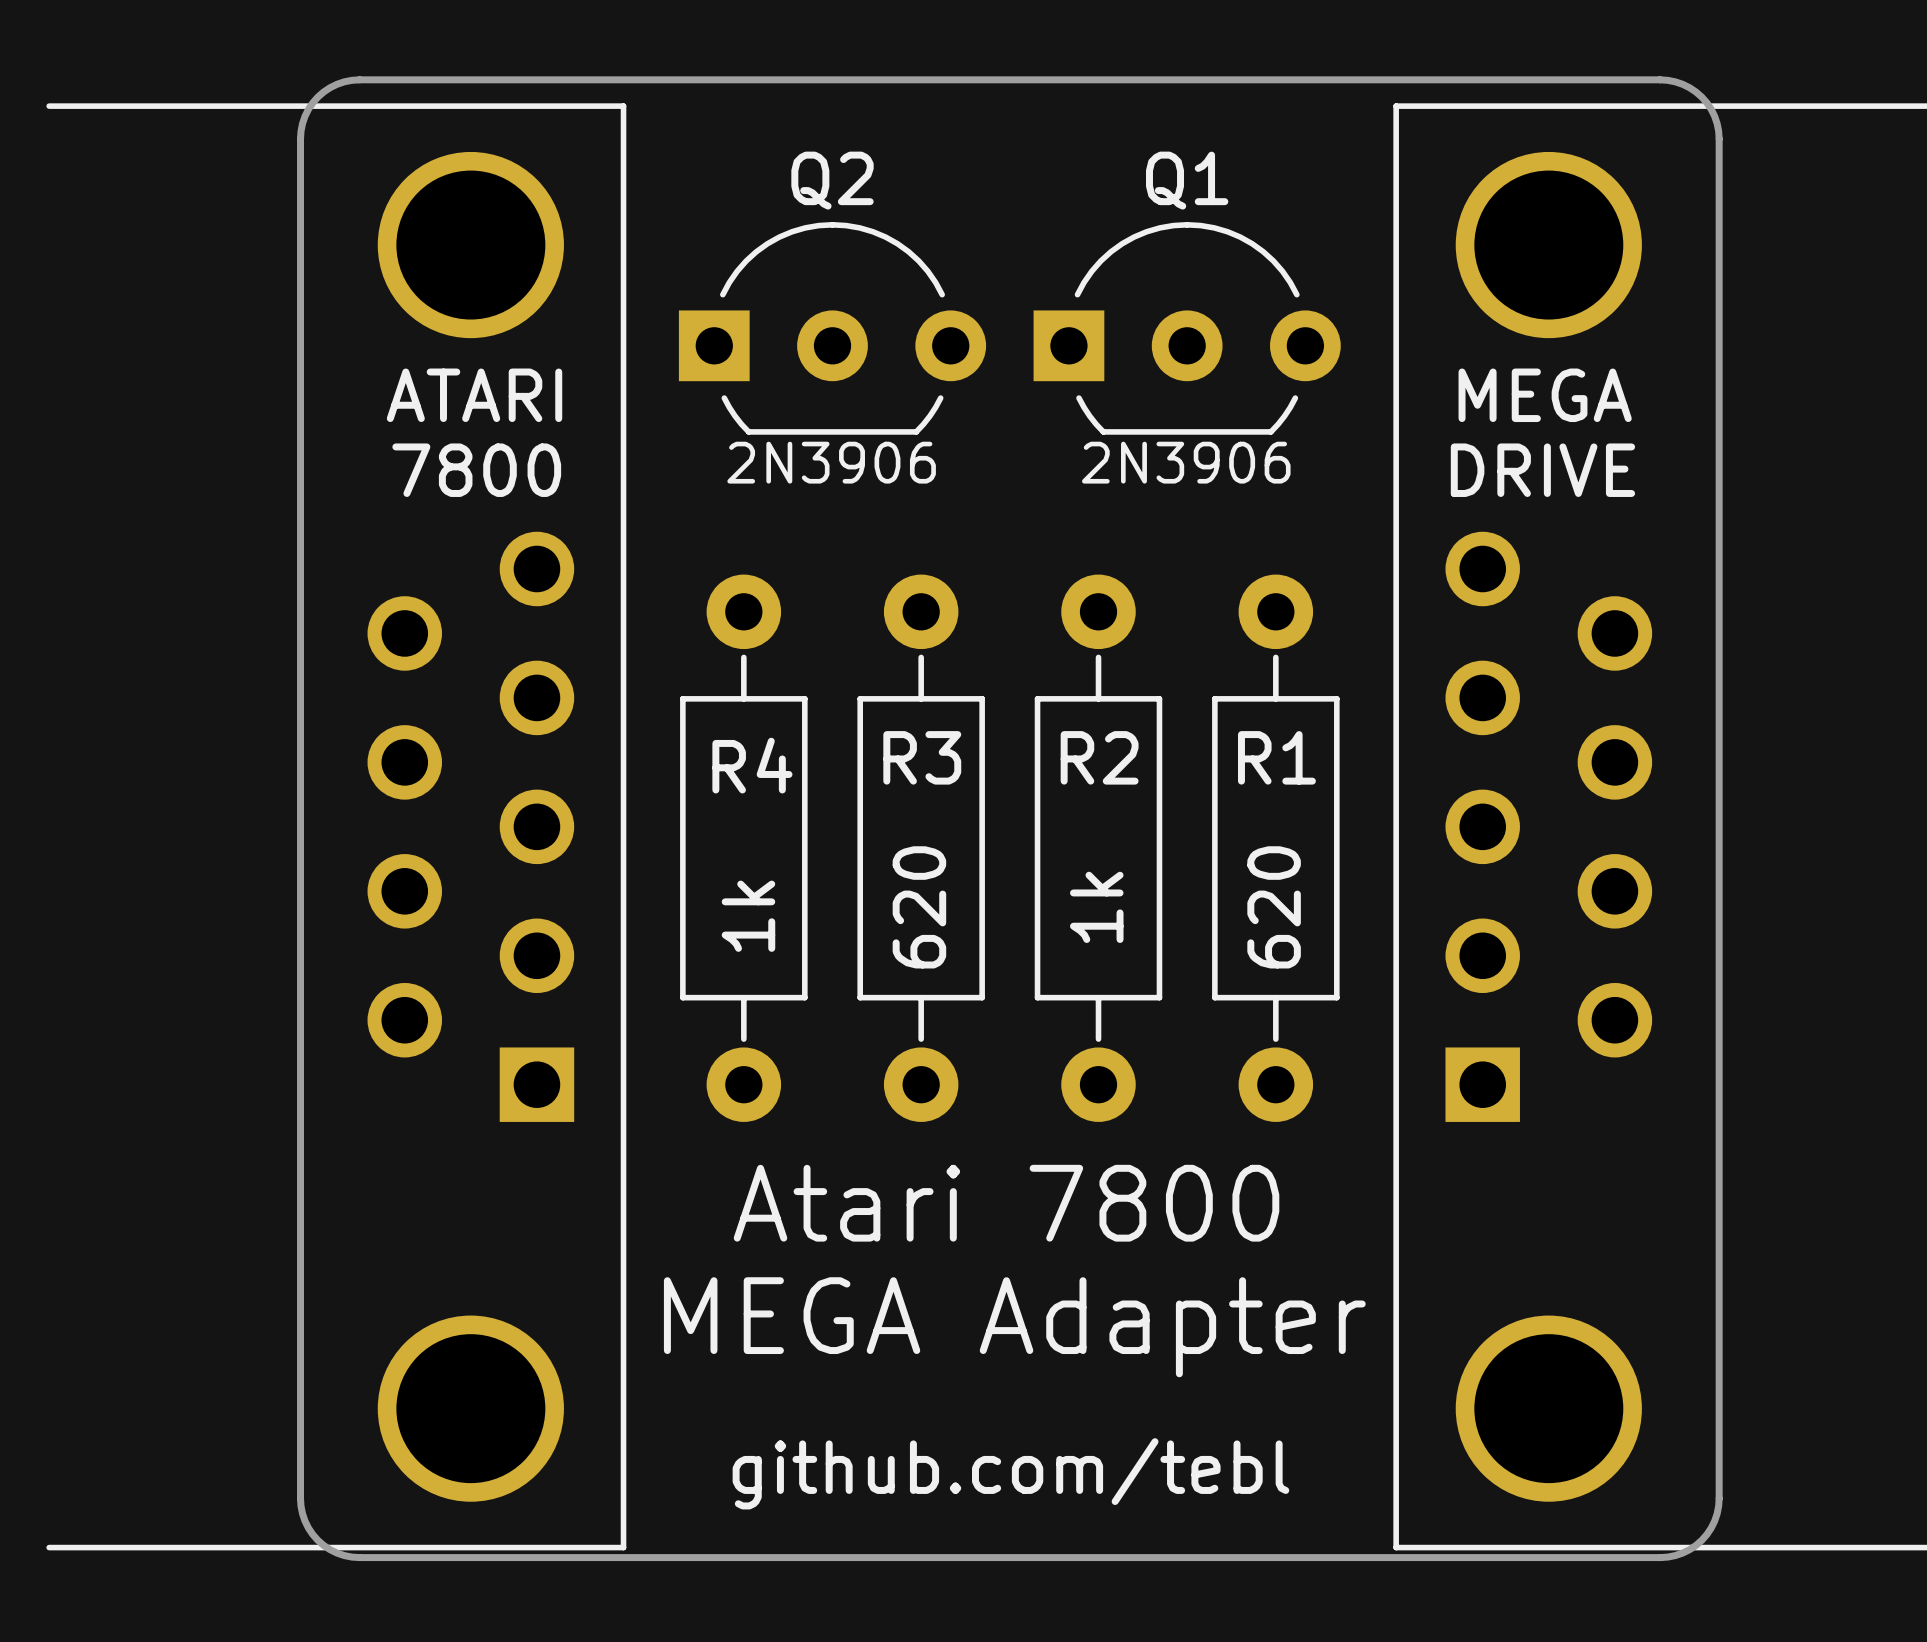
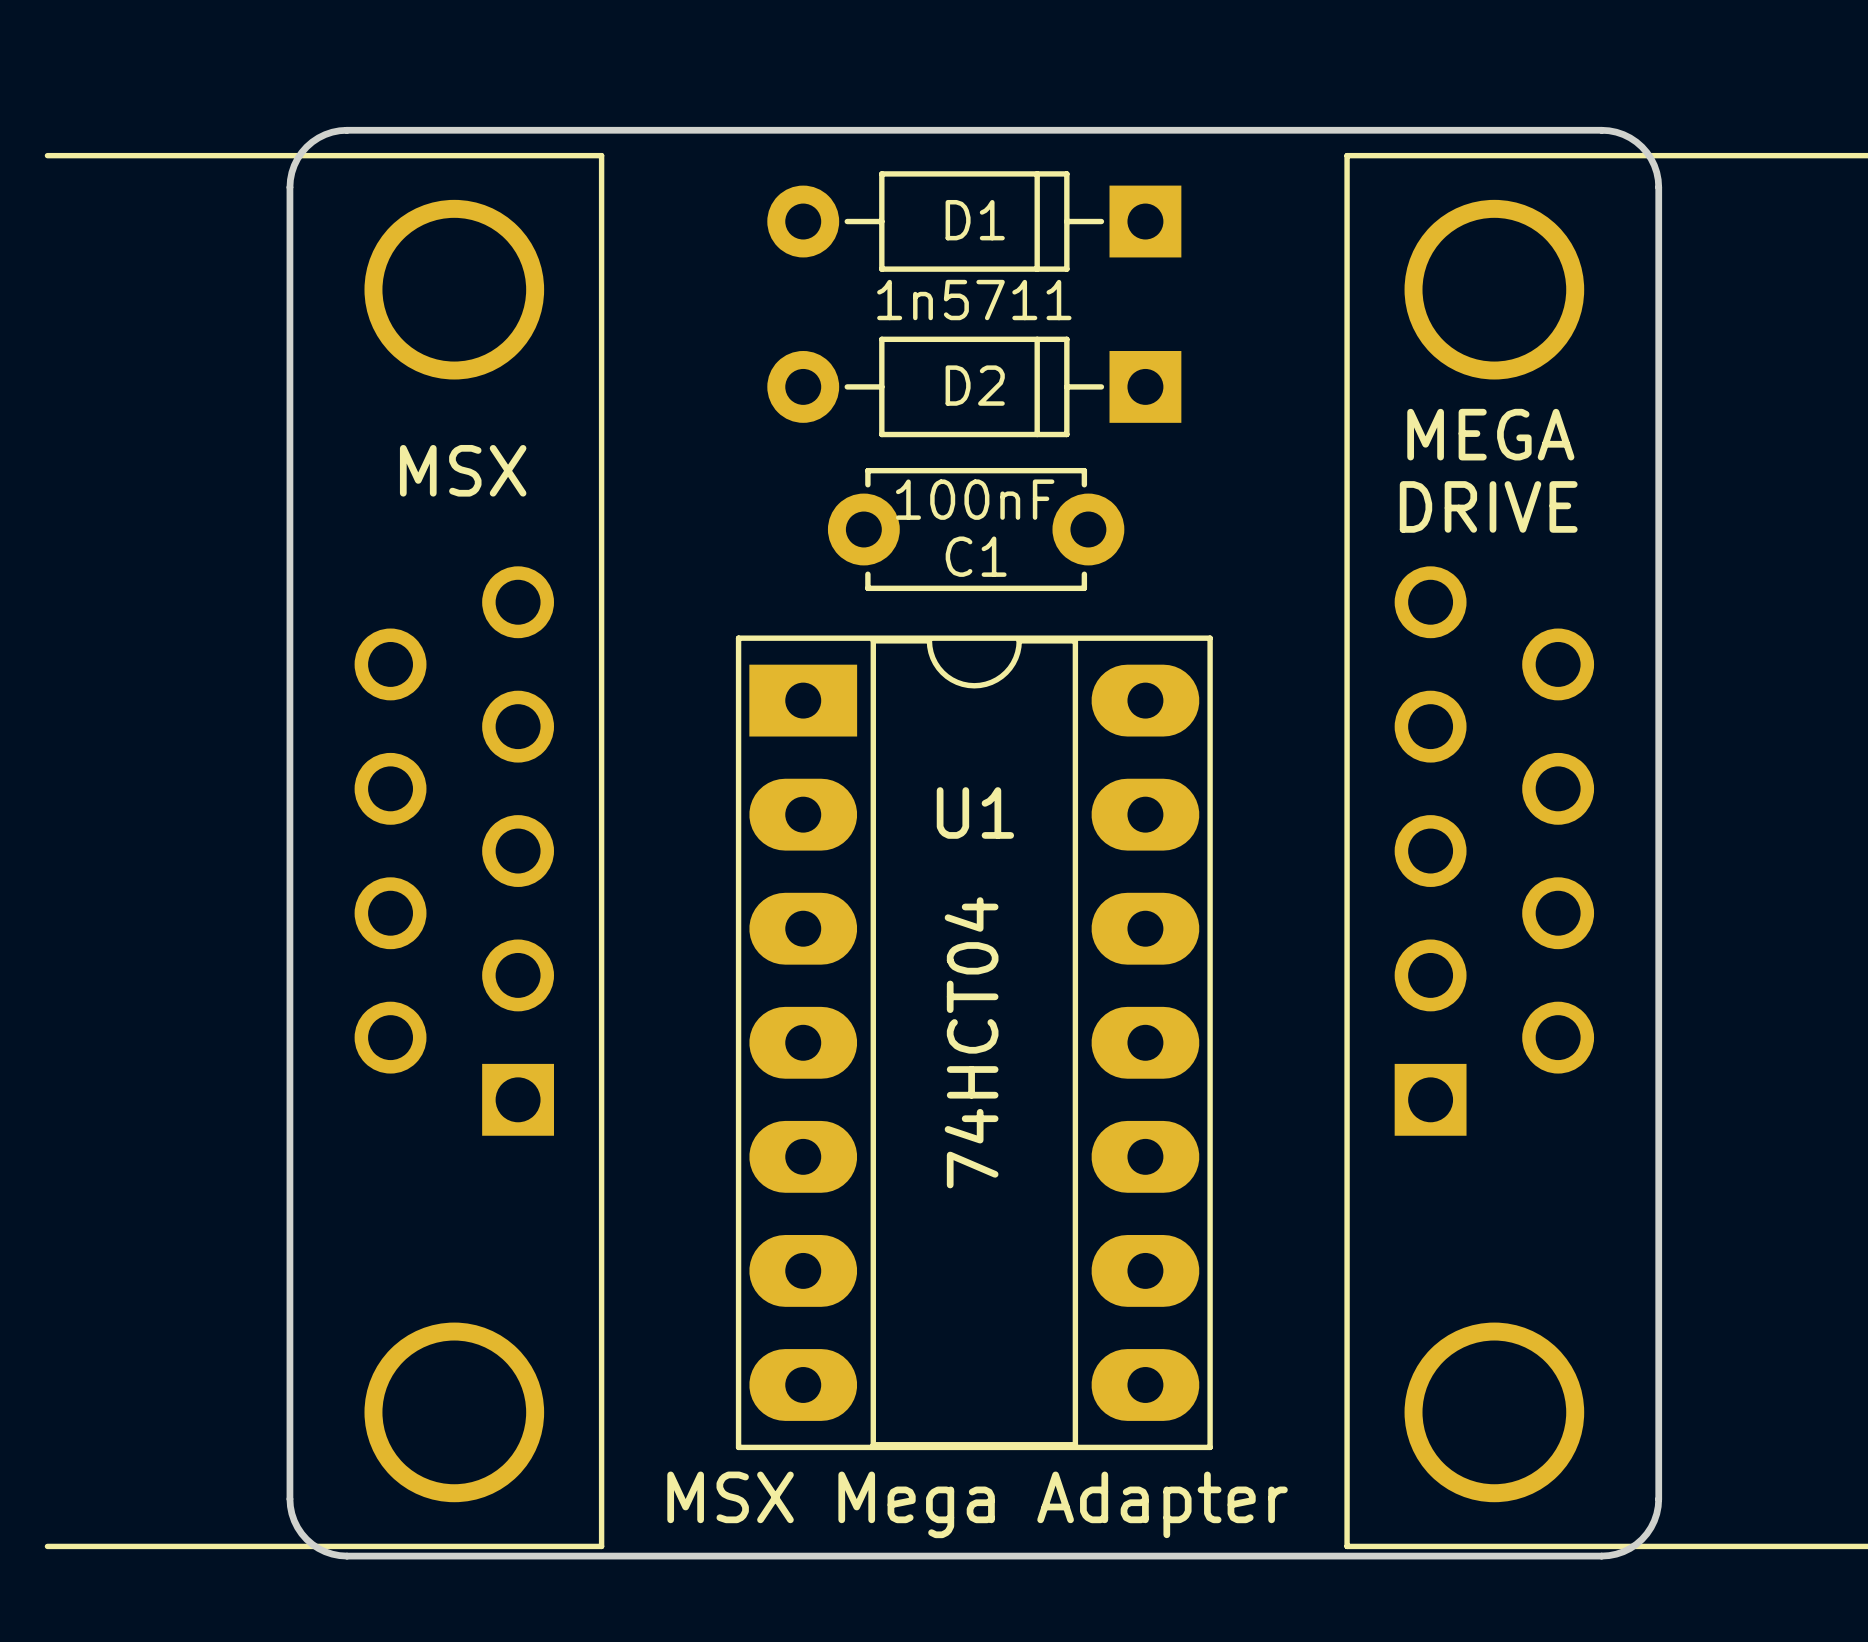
D1: none -> (974, 221)
Q2: 2N3906 (832, 328) -> none
Q1: 2N3906 (1187, 328) -> none
D2: none -> 1n5711 (974, 386)
text: ATARI (474, 395) -> none
text: none -> MSX (463, 470)
text: 7800 (476, 470) -> none
C1: none -> 100nF (976, 529)
R4: 1k (743, 848) -> none
R3: 620 (921, 848) -> none
R2: 1k (1098, 848) -> none
R1: 620 (1275, 848) -> none
U1: none -> 74HCT04 (974, 1042)
text: Atari 7800 (1006, 1203) -> none
text: MEGA Adapter (1014, 1327) -> none
text: github.com/tebl (1010, 1473) -> MSX Mega Adapter (977, 1504)

